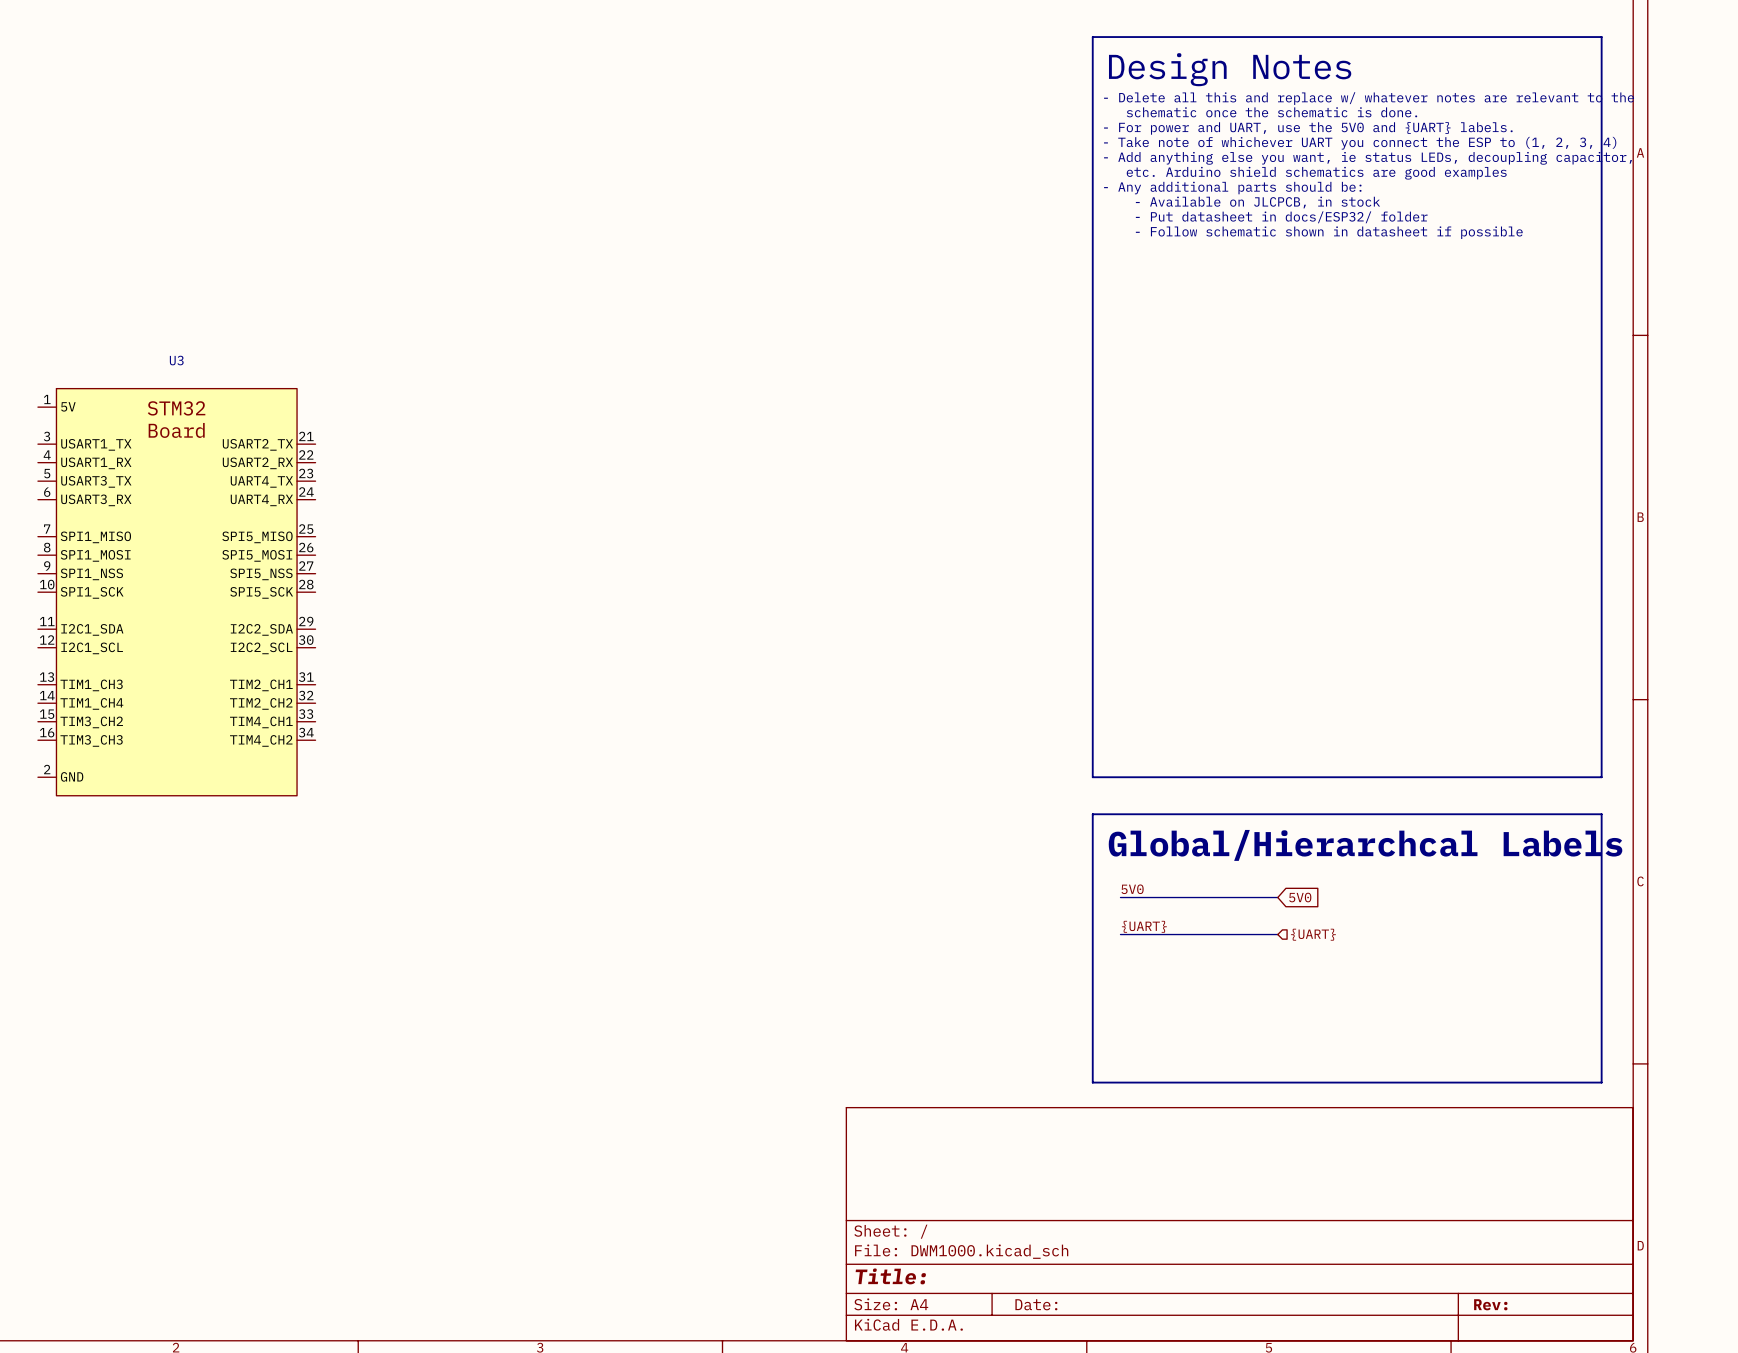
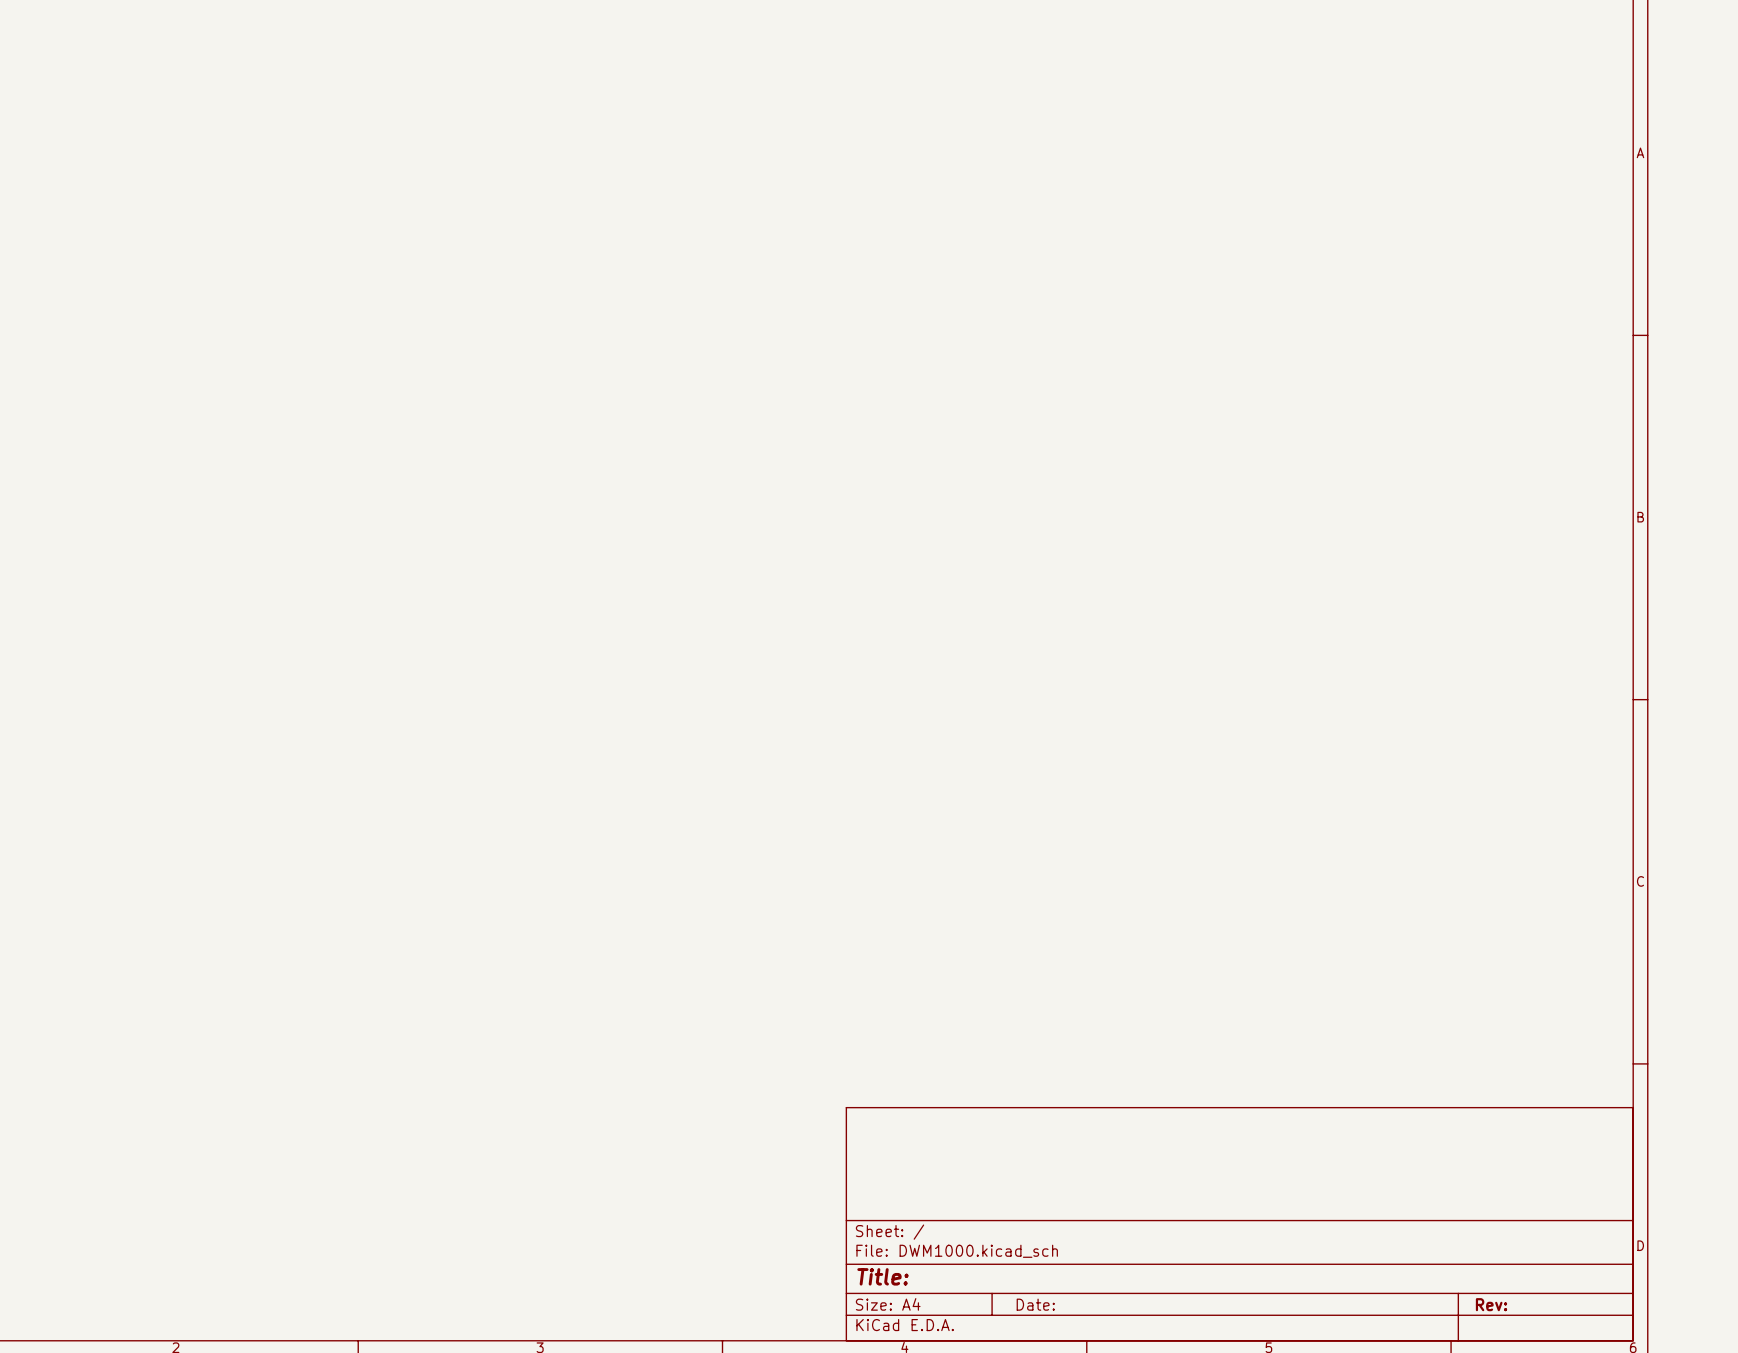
line: (1092, 37) (1601, 37) (1601, 777) (1092, 777) (1092, 37) -> none
text: Design Notes (1230, 69) -> none
text: - Delete all this and replace w/ whatever notes are relevant to the (1369, 98) -> none
text: schematic once the schematic is done. (1271, 112) -> none
text: - For power and UART, use the 5V0 and {UART} labels. (1308, 128) -> none
text: - Take note of whichever UART you connect the ESP to (1, 2, 3, 4) (1360, 143) -> none
text: - Add anything else you want, ie status LEDs, decoupling capacitor, (1368, 158) -> none
text: etc. Arduino shield schematics are good examples (1316, 173) -> none
text: - Any additional parts should be: (1232, 188) -> none
text: - Available on JLCPCB, in stock (1257, 202) -> none
text: - Put datasheet in docs/ESP32/ folder (1281, 217) -> none
text: - Follow schematic shown in datasheet if possible (1329, 232) -> none
U3: (176, 592) -> none
line: (1092, 814) (1092, 1082) (1601, 1082) (1601, 814) (1092, 814) -> none
text: Global/Hierarchcal Labels (1365, 845) -> none
label: 5V0 (1132, 889) -> none
wire: (1120, 897) (1277, 897) -> none
global label: 5V0 (1300, 897) -> none
label: {UART} (1144, 926) -> none
bus: (1120, 934) (1277, 934) -> none
hierarchical label: {UART} (1313, 934) -> none

